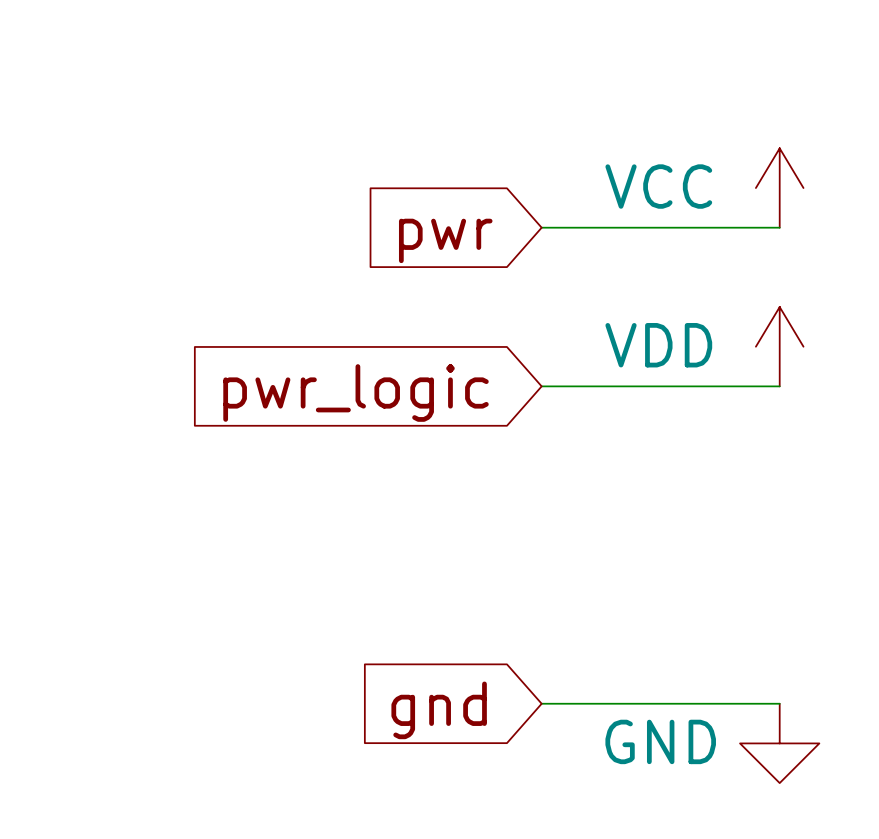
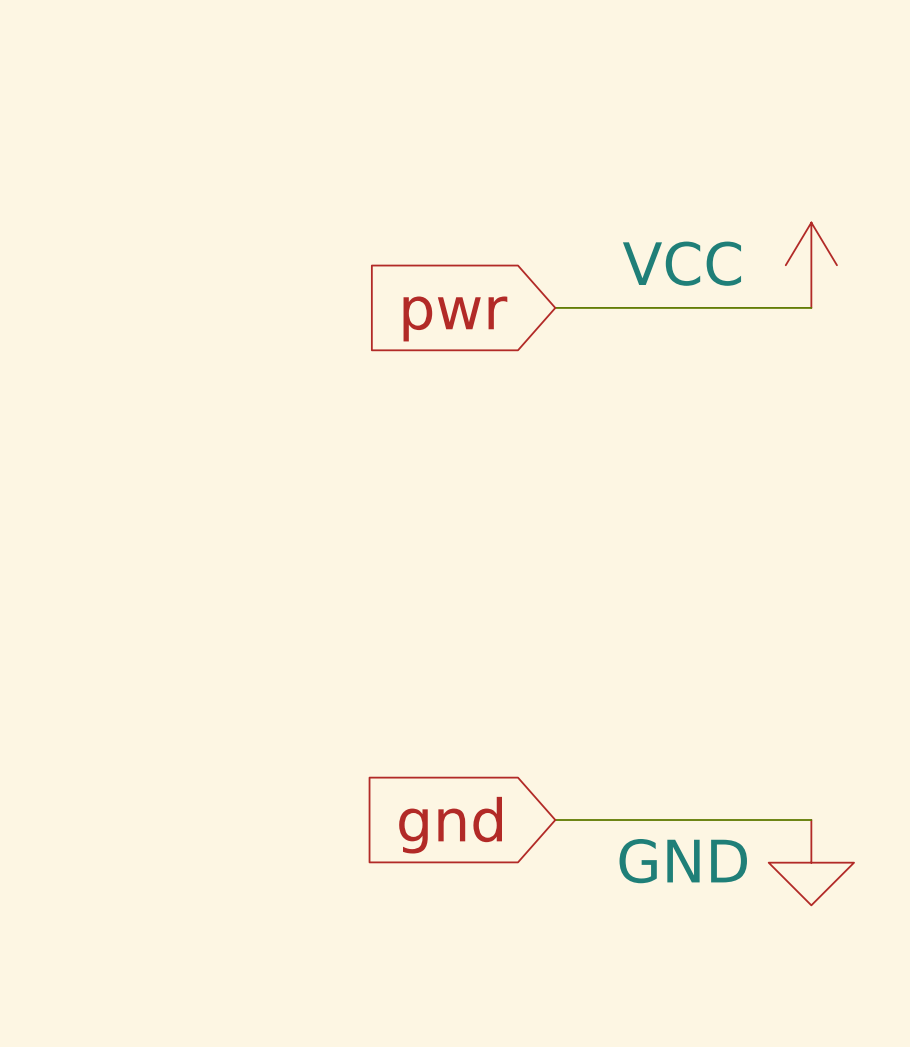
power symbol: VDD (779, 346) -> none
wire: (541, 386) (779, 386) -> none
global label: pwr_logic (356, 392) -> none

